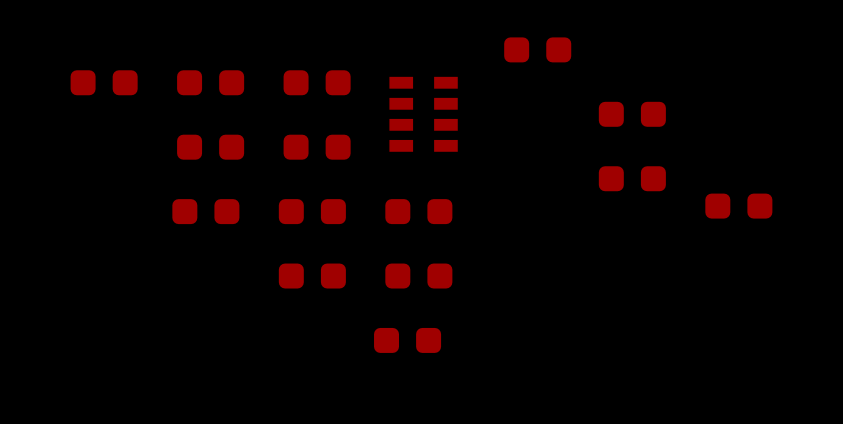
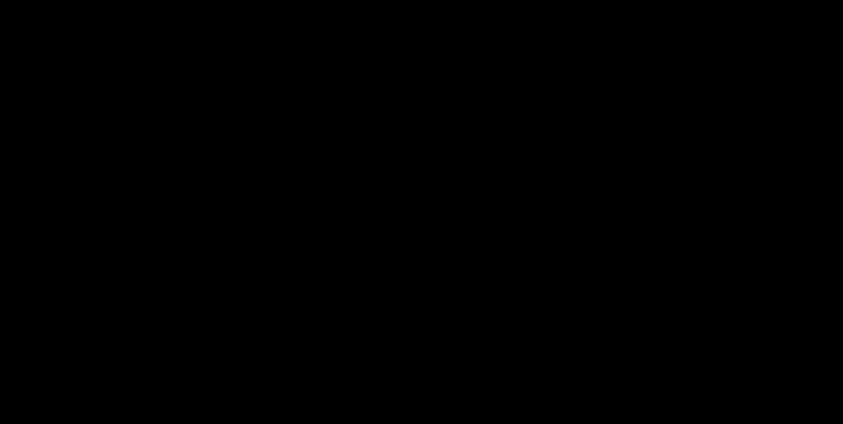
part: (537, 49) -> none
part: (104, 82) -> none
part: (210, 82) -> none
part: (317, 82) -> none
part: (423, 114) -> none
part: (632, 114) -> none
part: (210, 147) -> none
part: (317, 147) -> none
part: (632, 178) -> none
part: (738, 206) -> none
part: (205, 211) -> none
part: (312, 211) -> none
part: (418, 211) -> none
part: (312, 276) -> none
part: (418, 276) -> none
part: (407, 340) -> none

